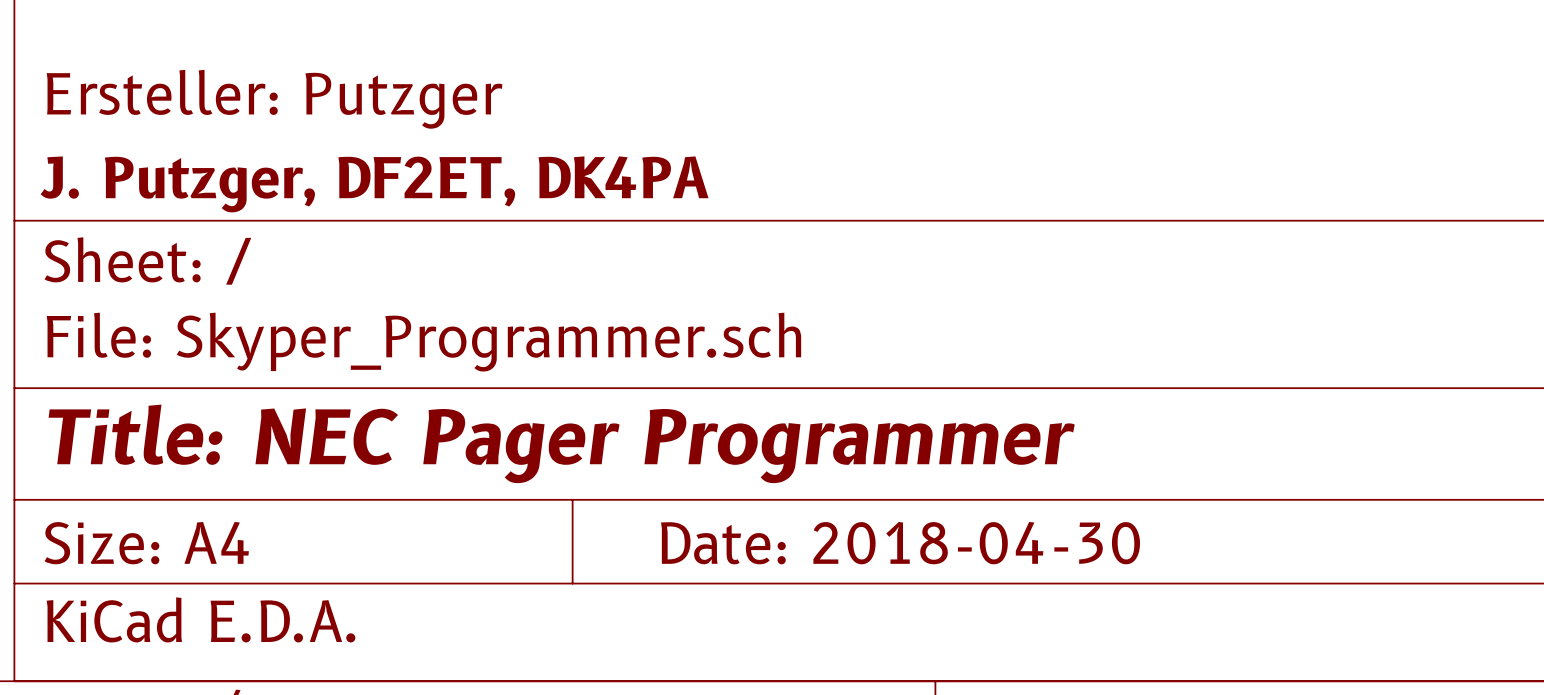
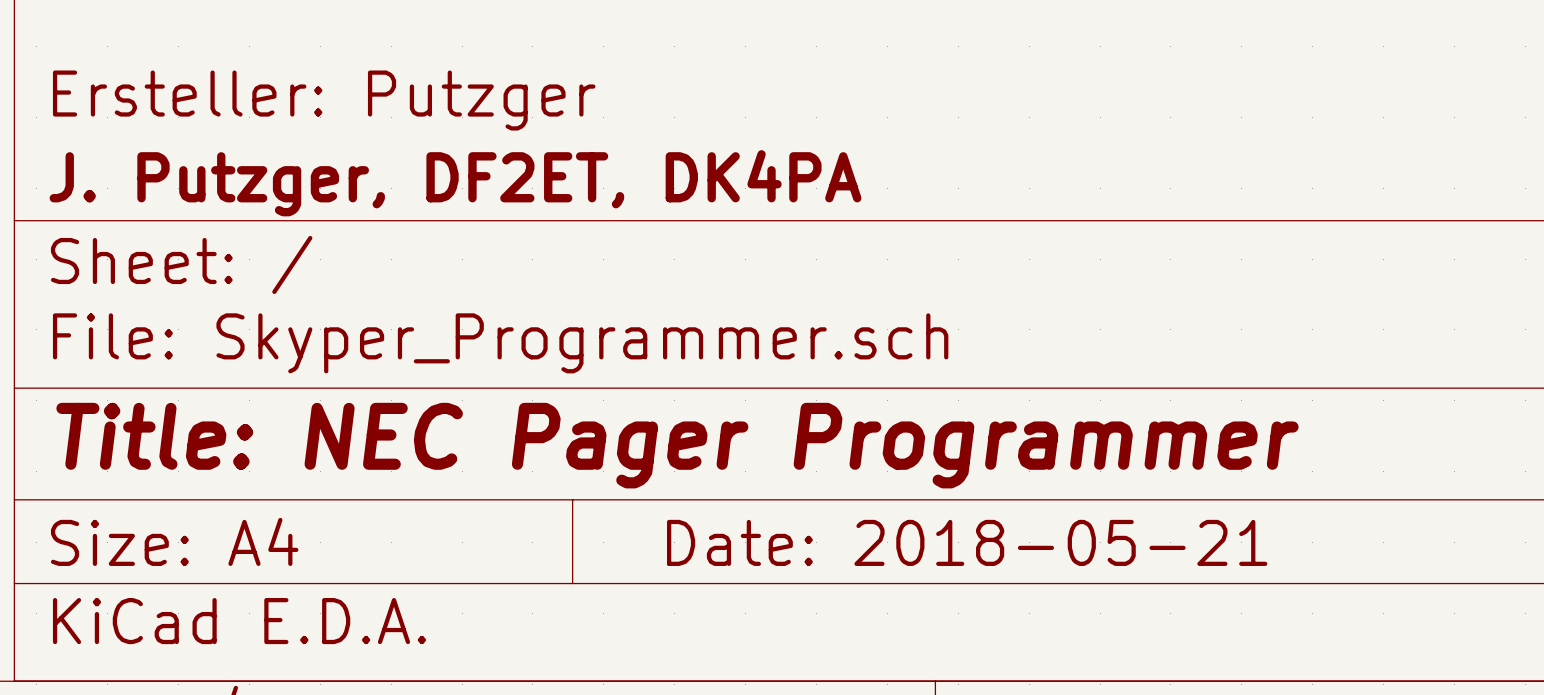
title block: Date: 2018-04-30 (900, 543) -> Date: 2018-05-21 (967, 542)

